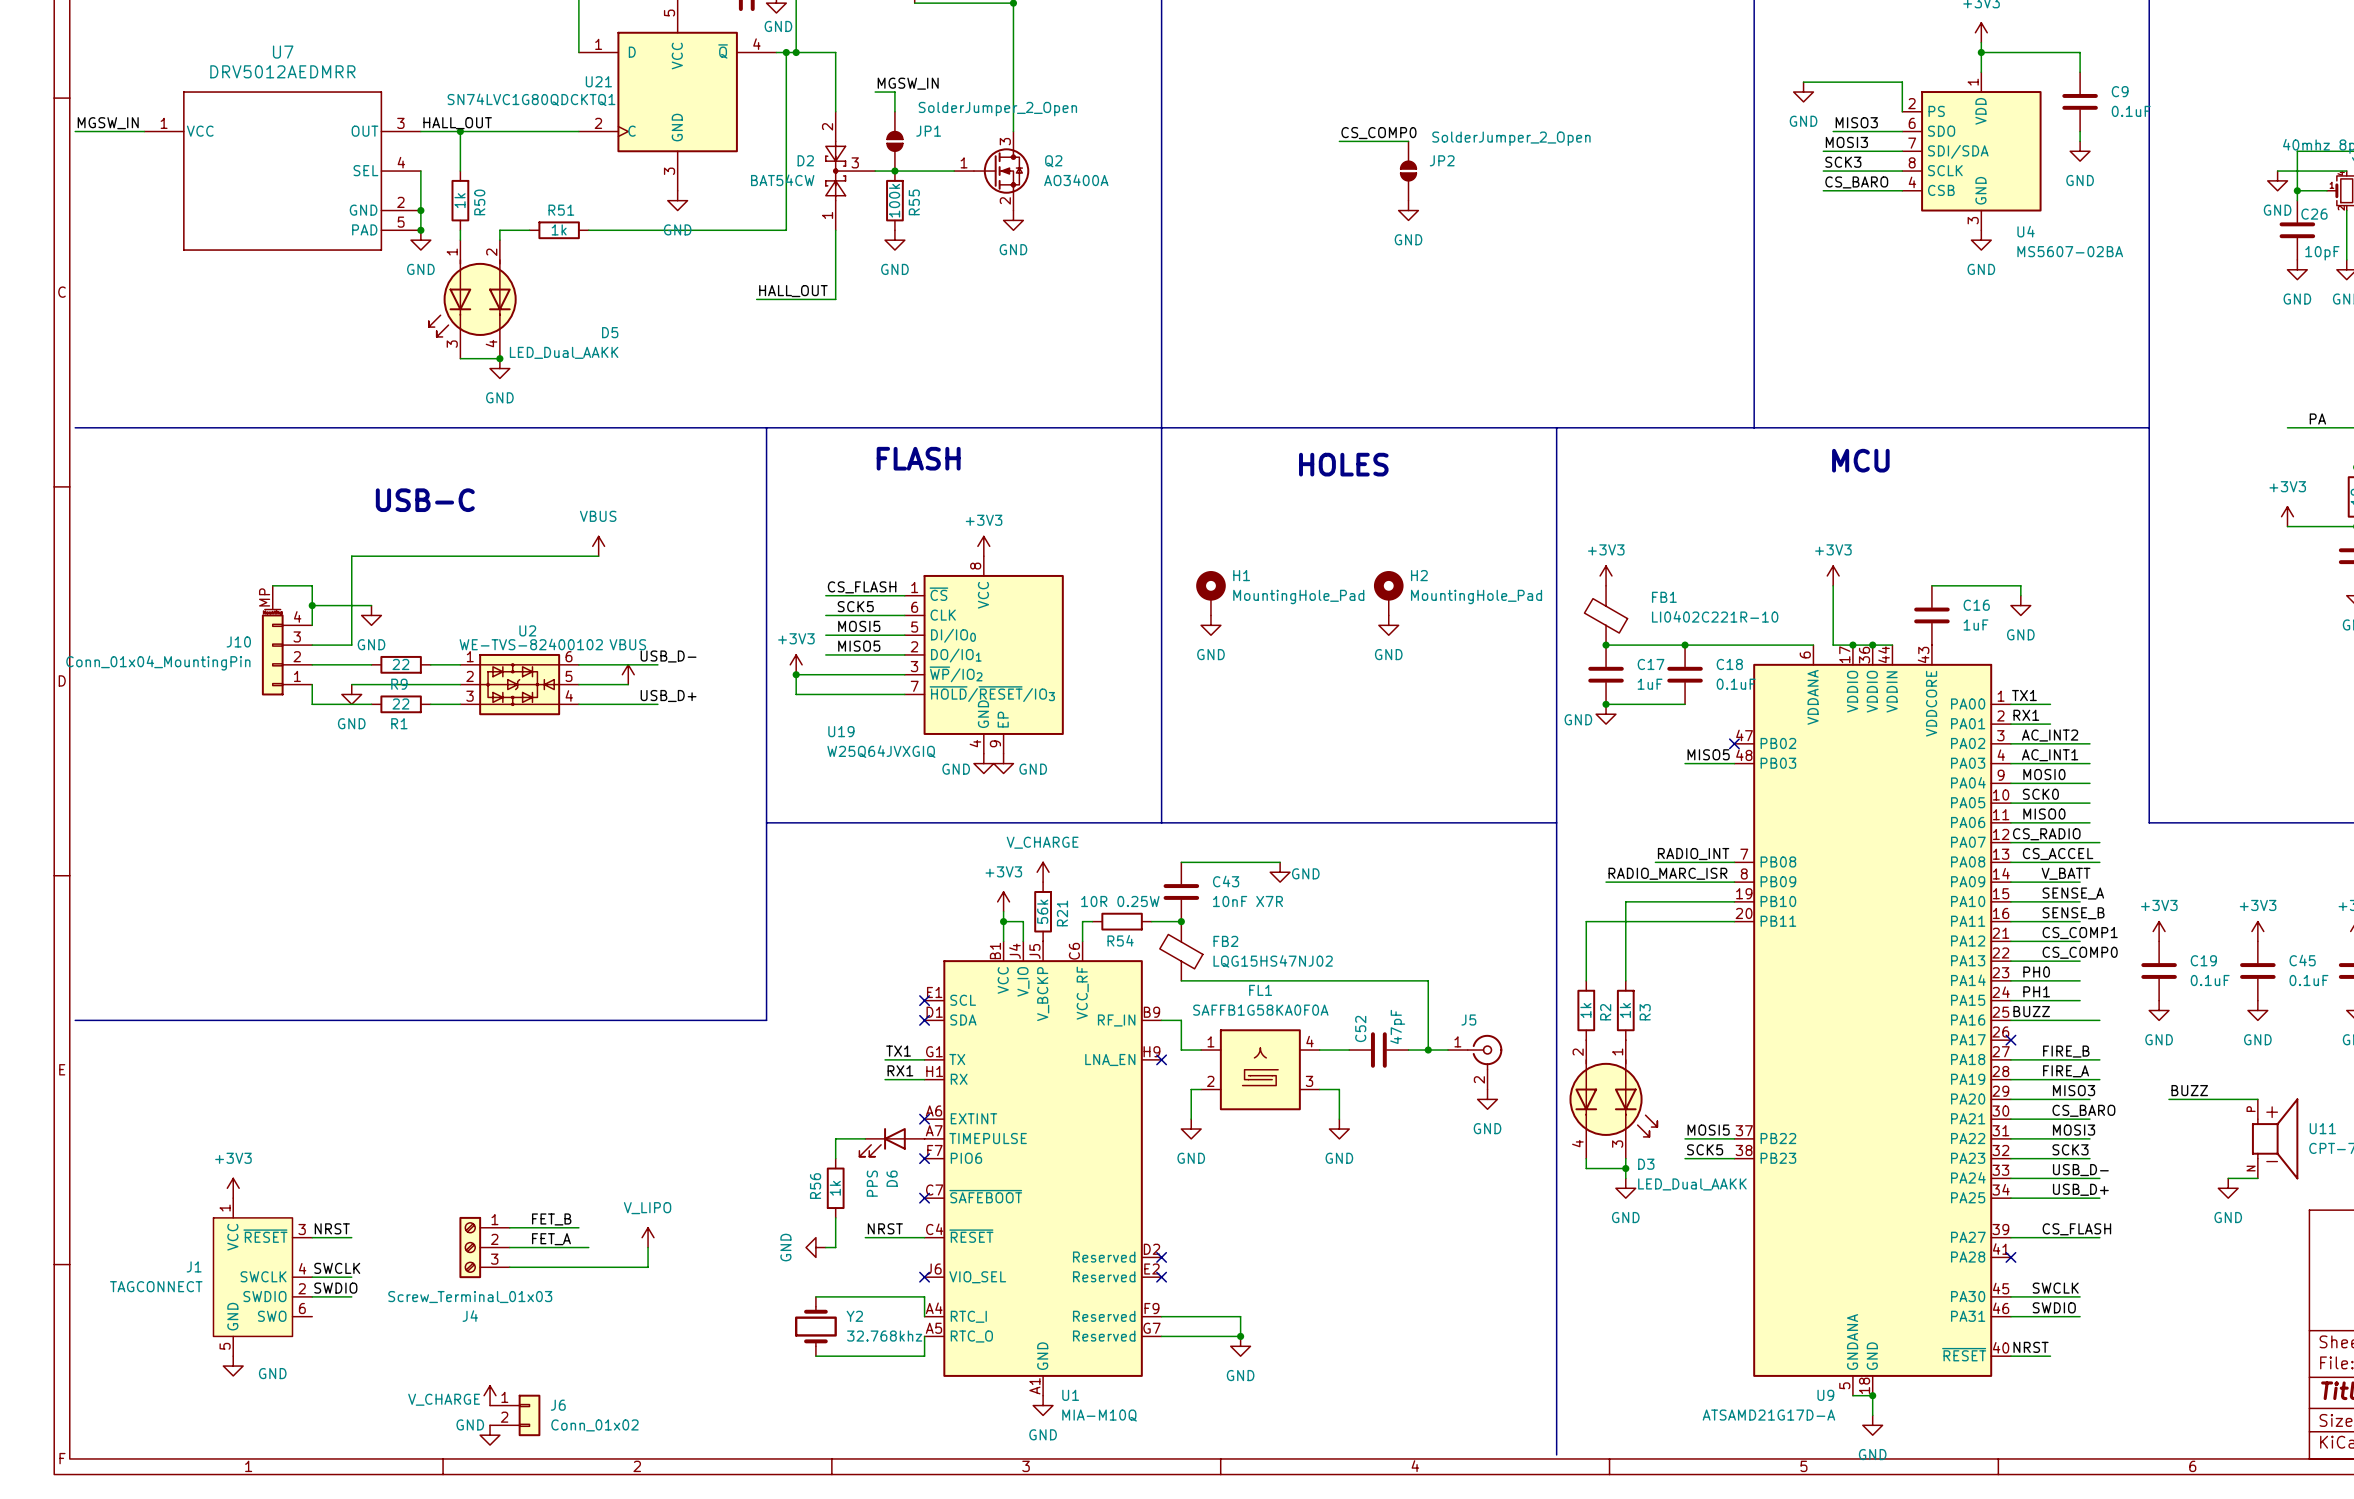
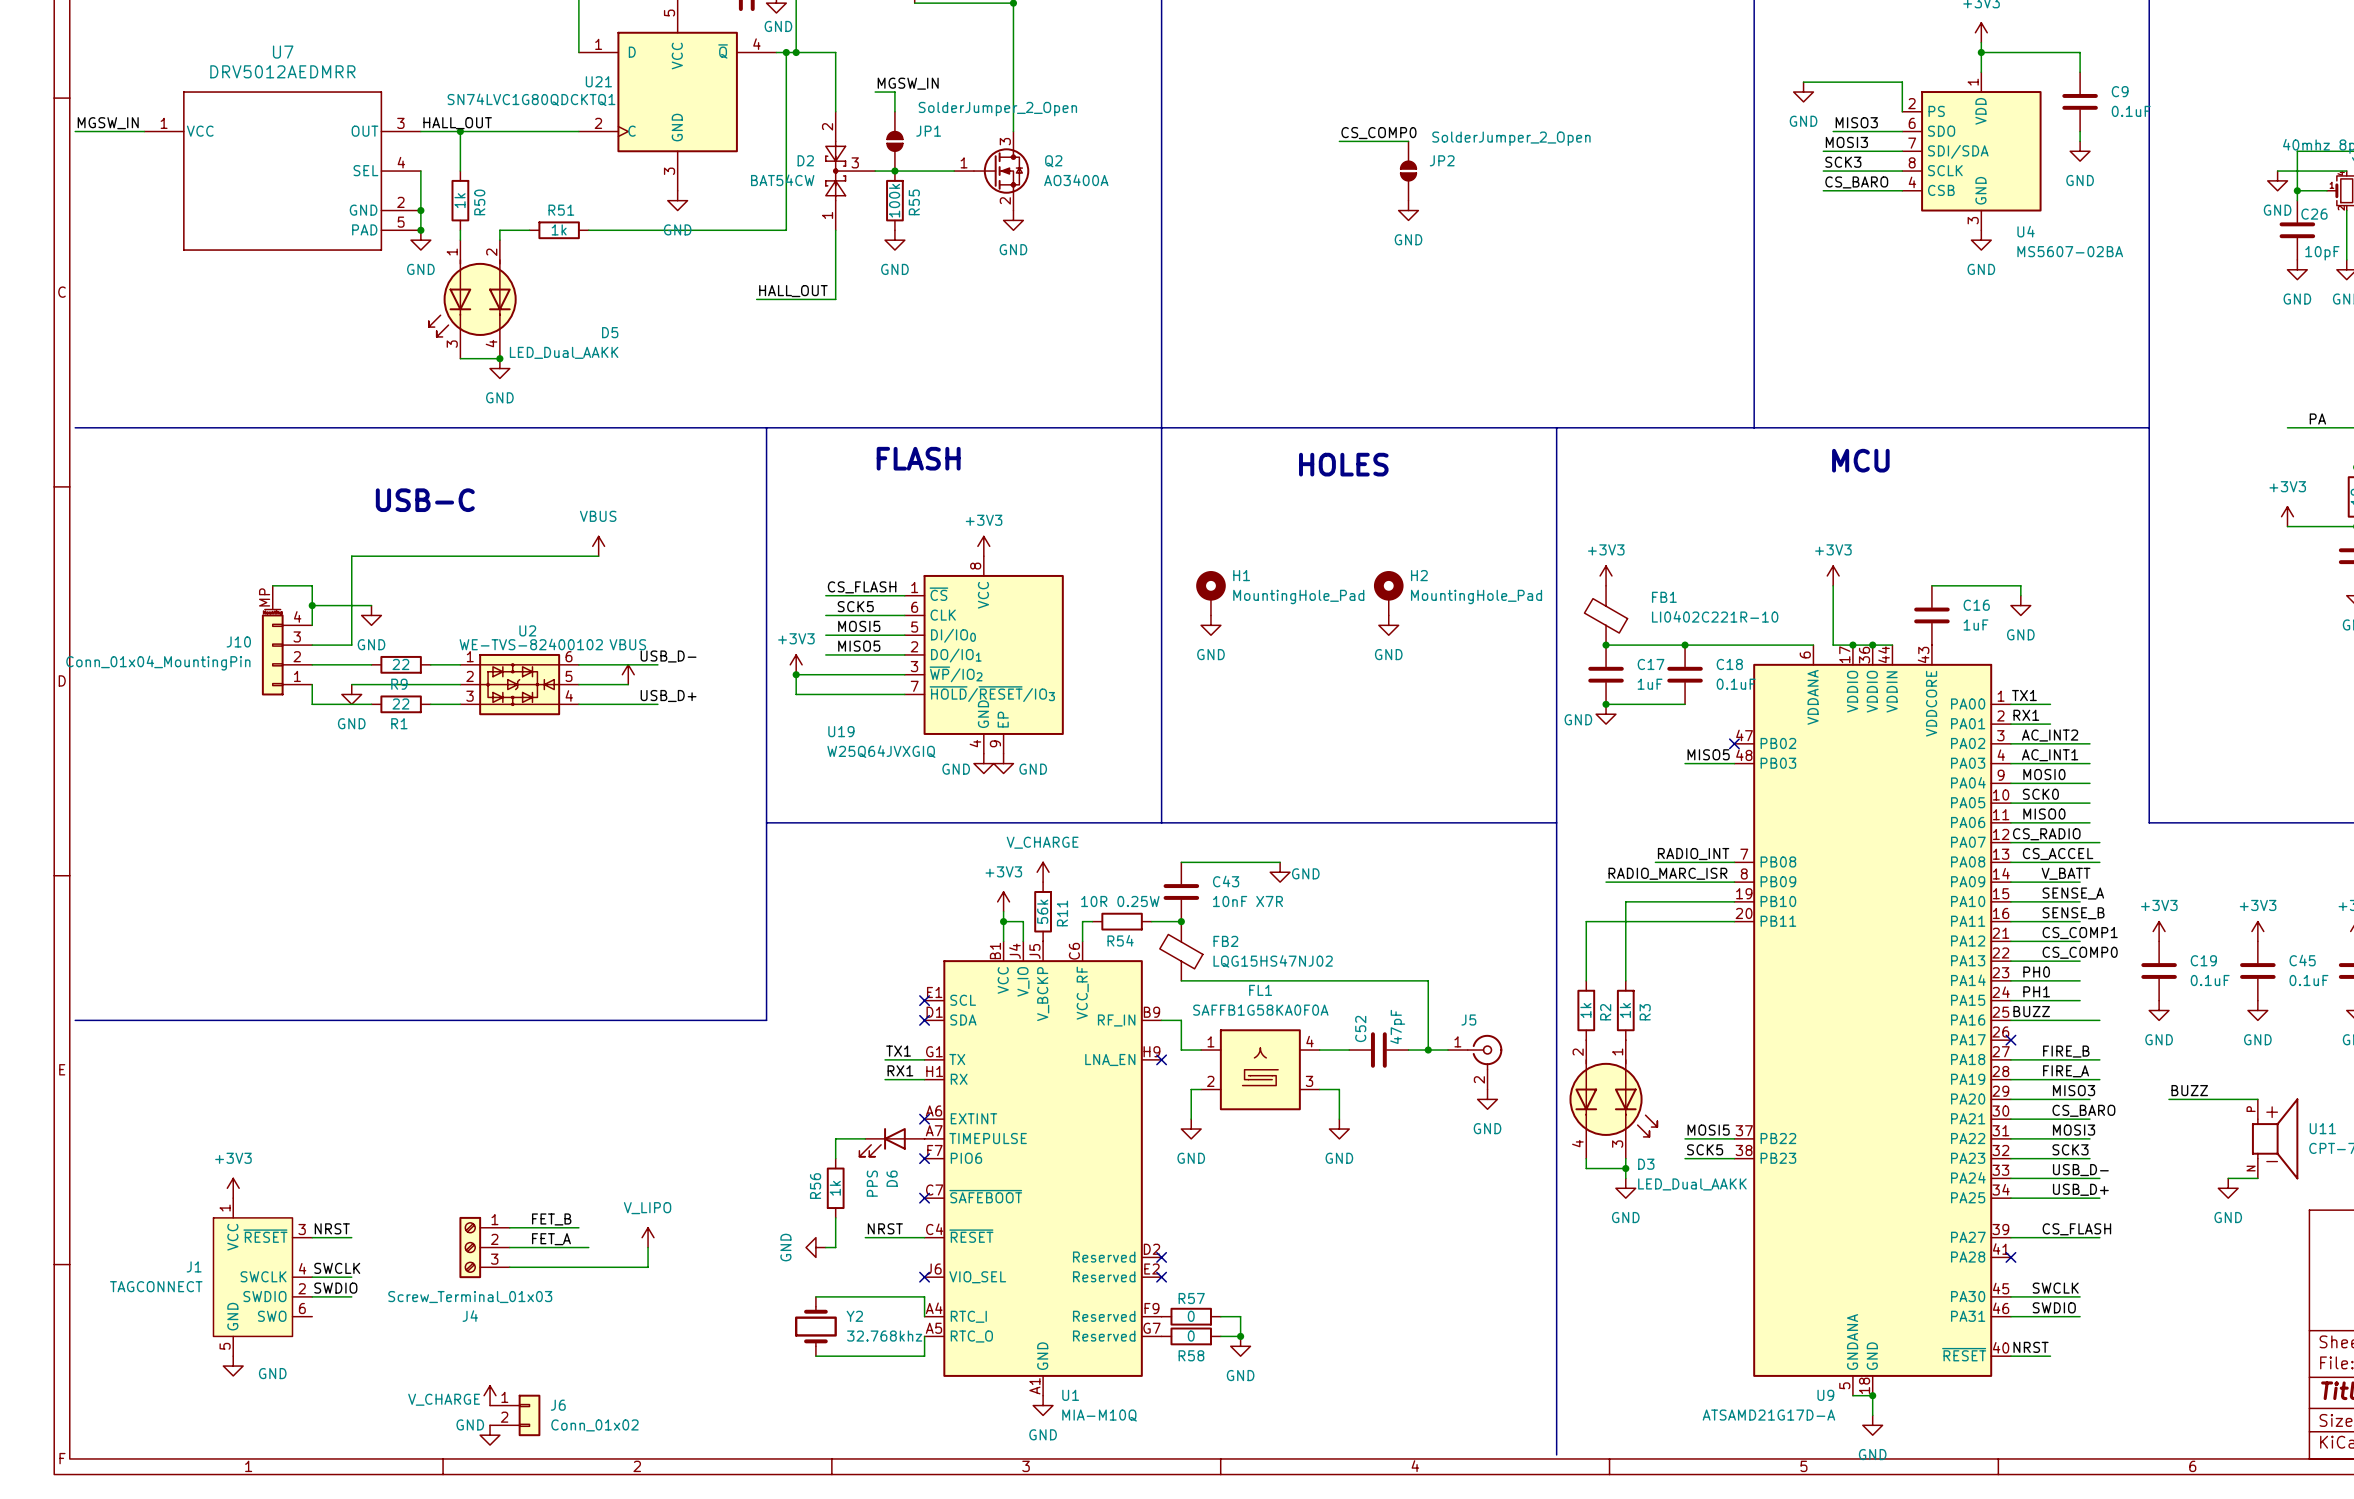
R21 name: R21 (1062, 913) -> R11 (1062, 913)
wire: (1161, 1316) (1220, 1316) -> none
R57: none -> 0 (1191, 1316)
wire: (1161, 1336) (1220, 1336) -> none
R58: none -> 0 (1191, 1336)

